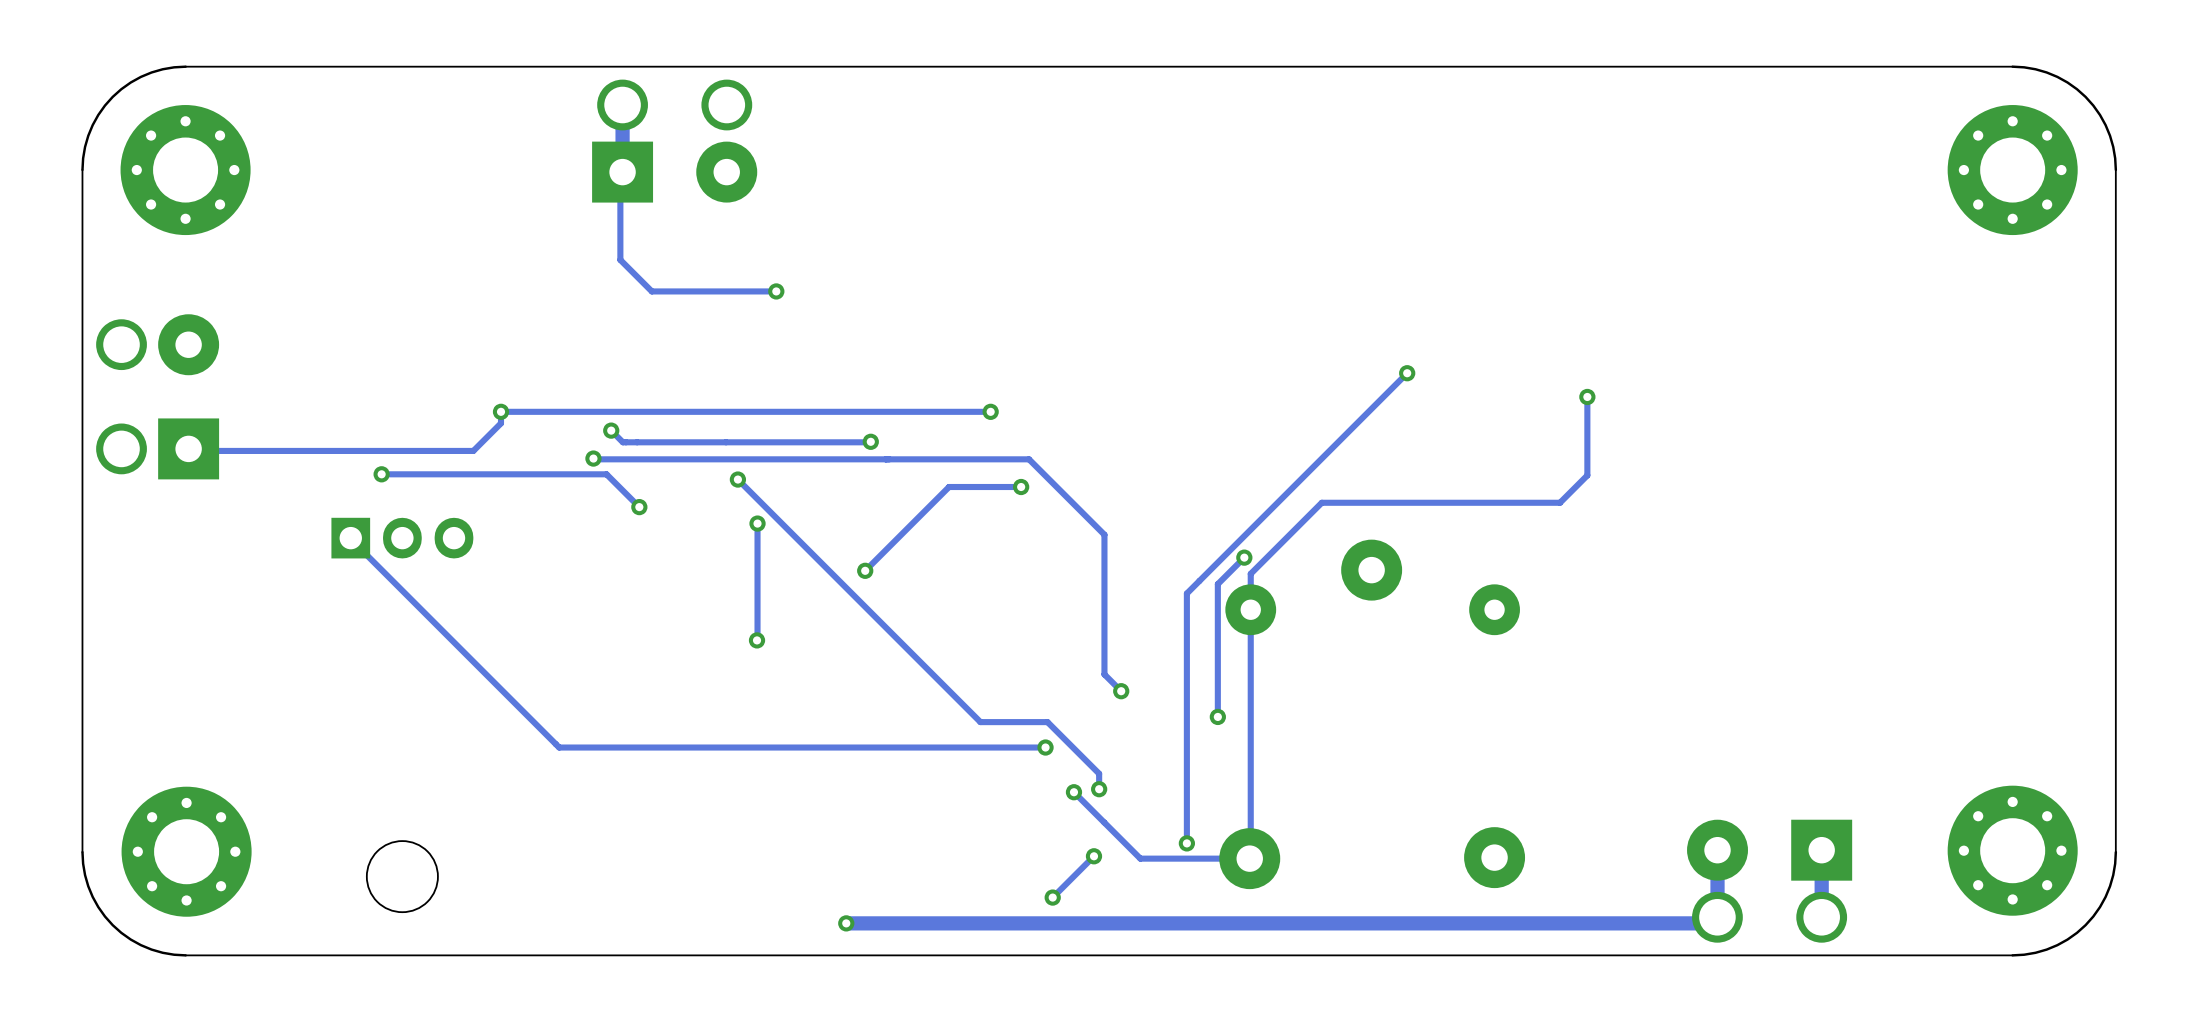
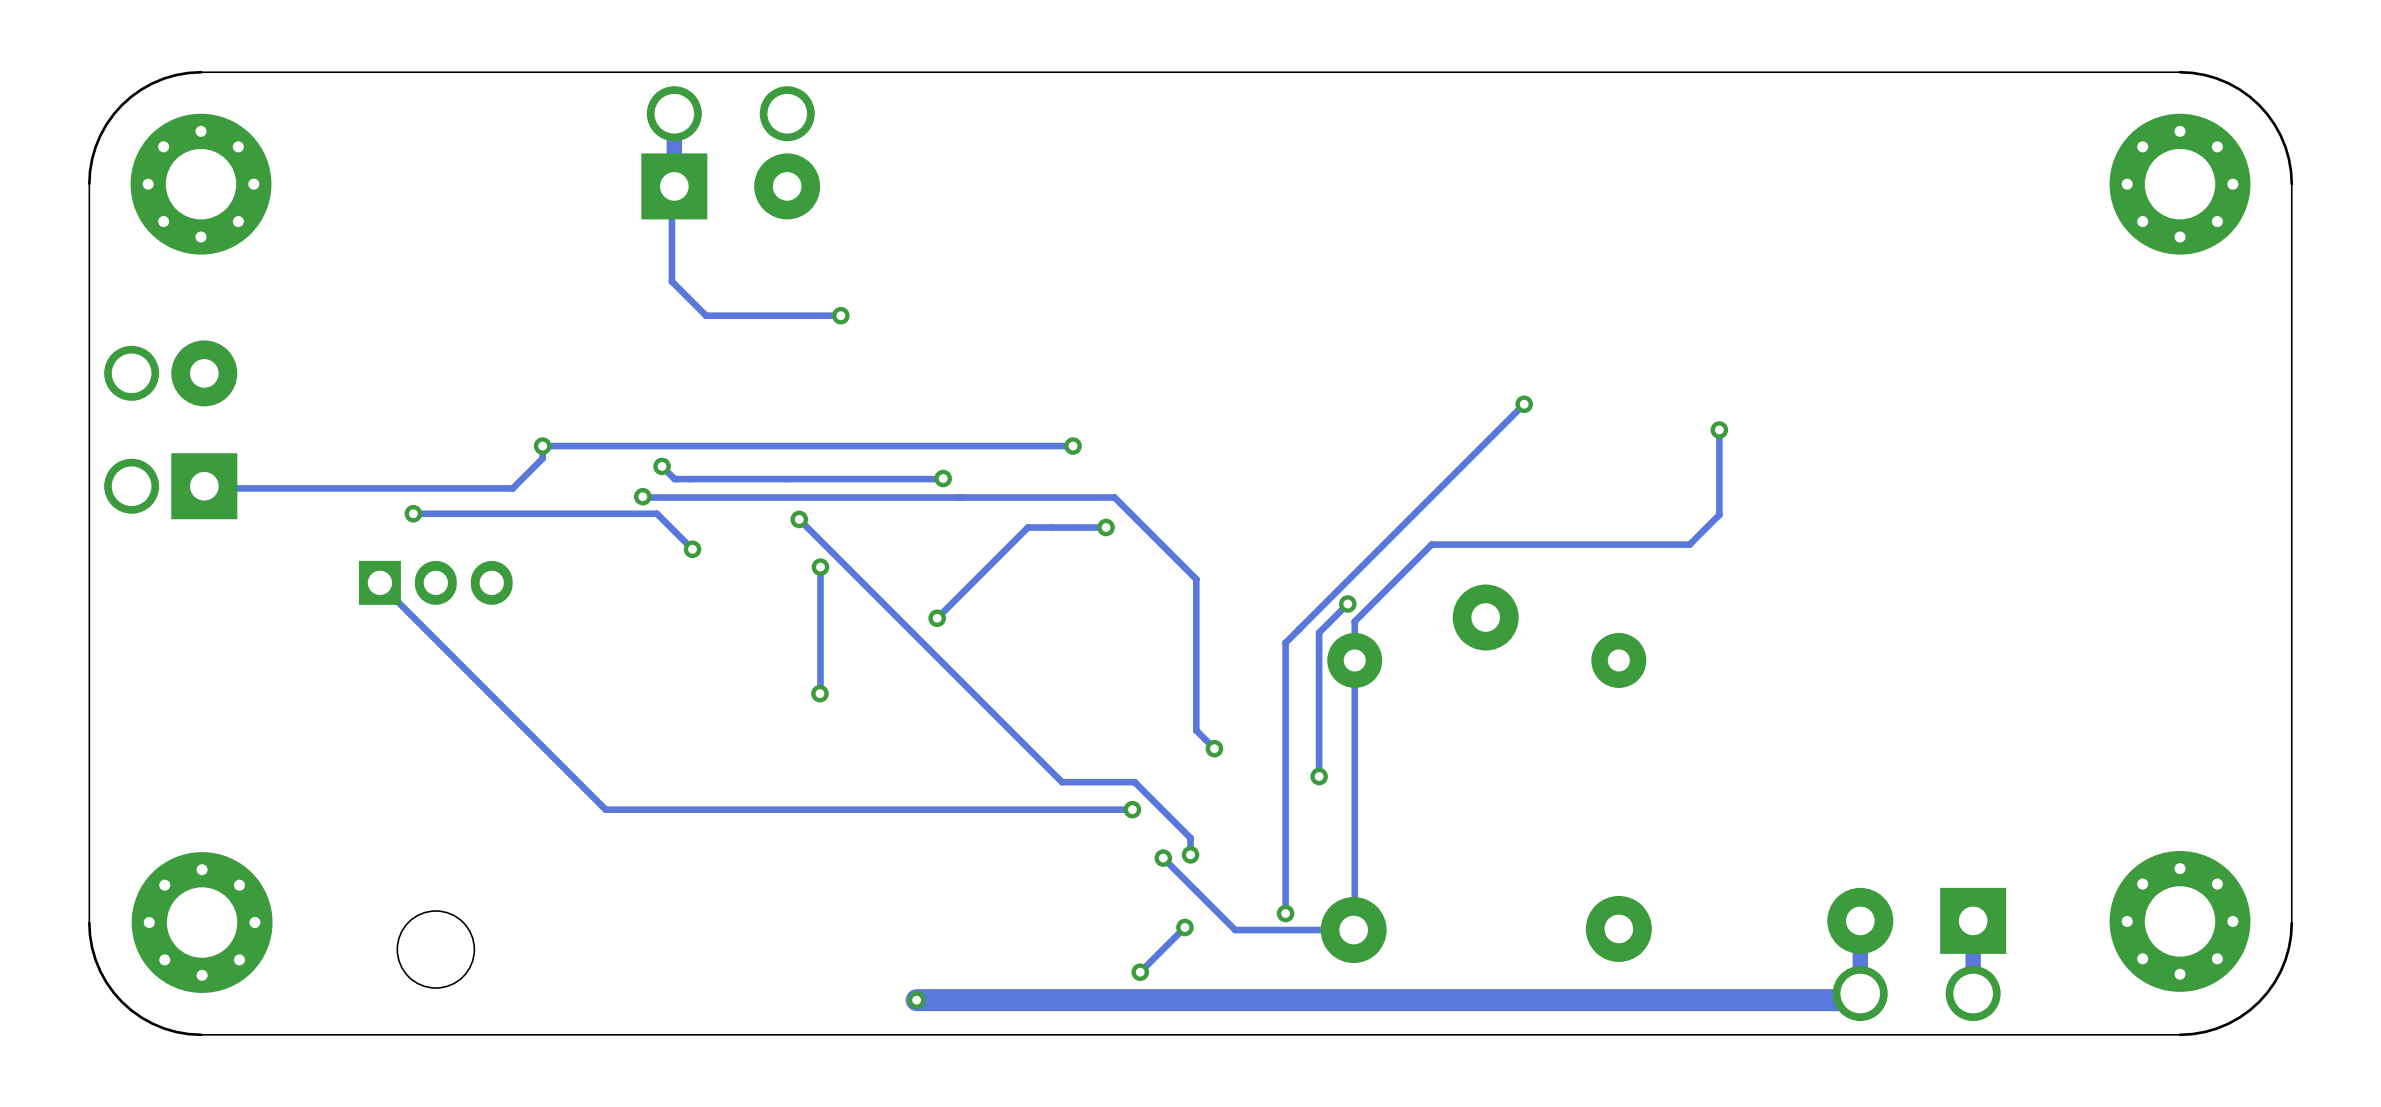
track width: thin (1717, 917) (1711, 923) (846, 923) -> thick (1860, 993) (1853, 1000) (916, 1000)

